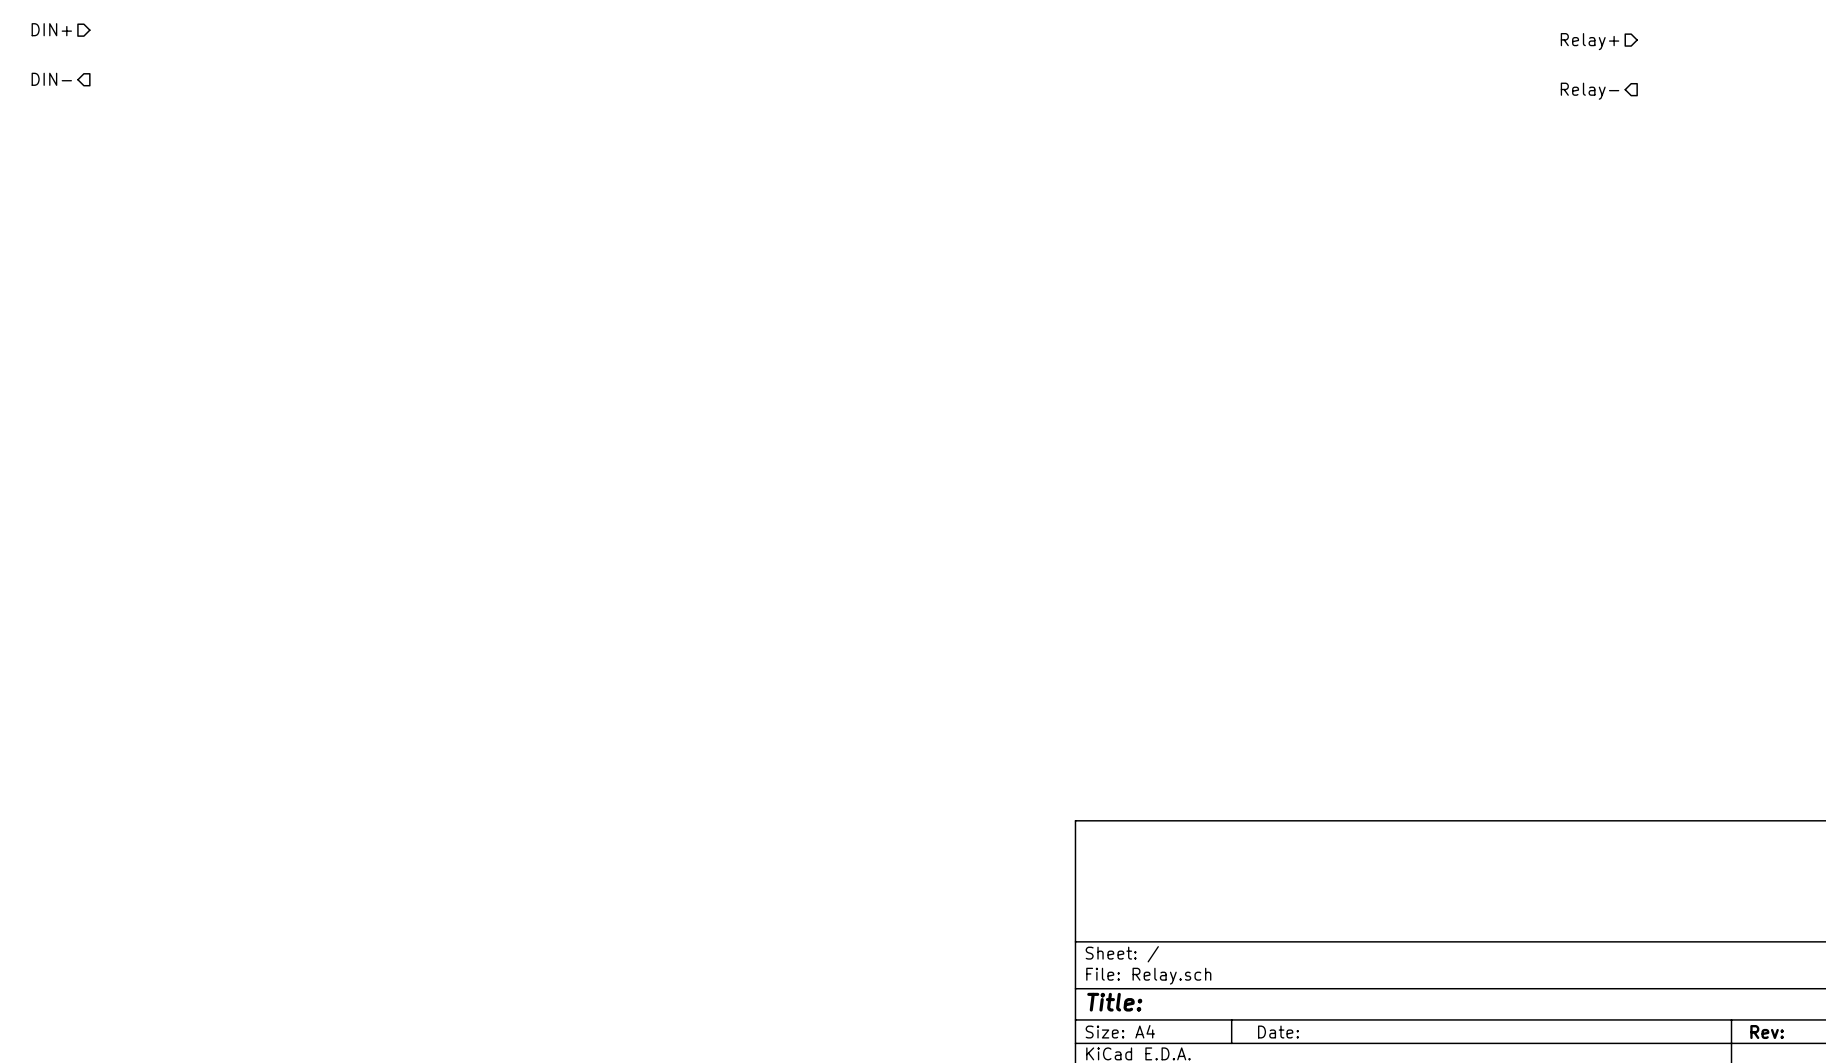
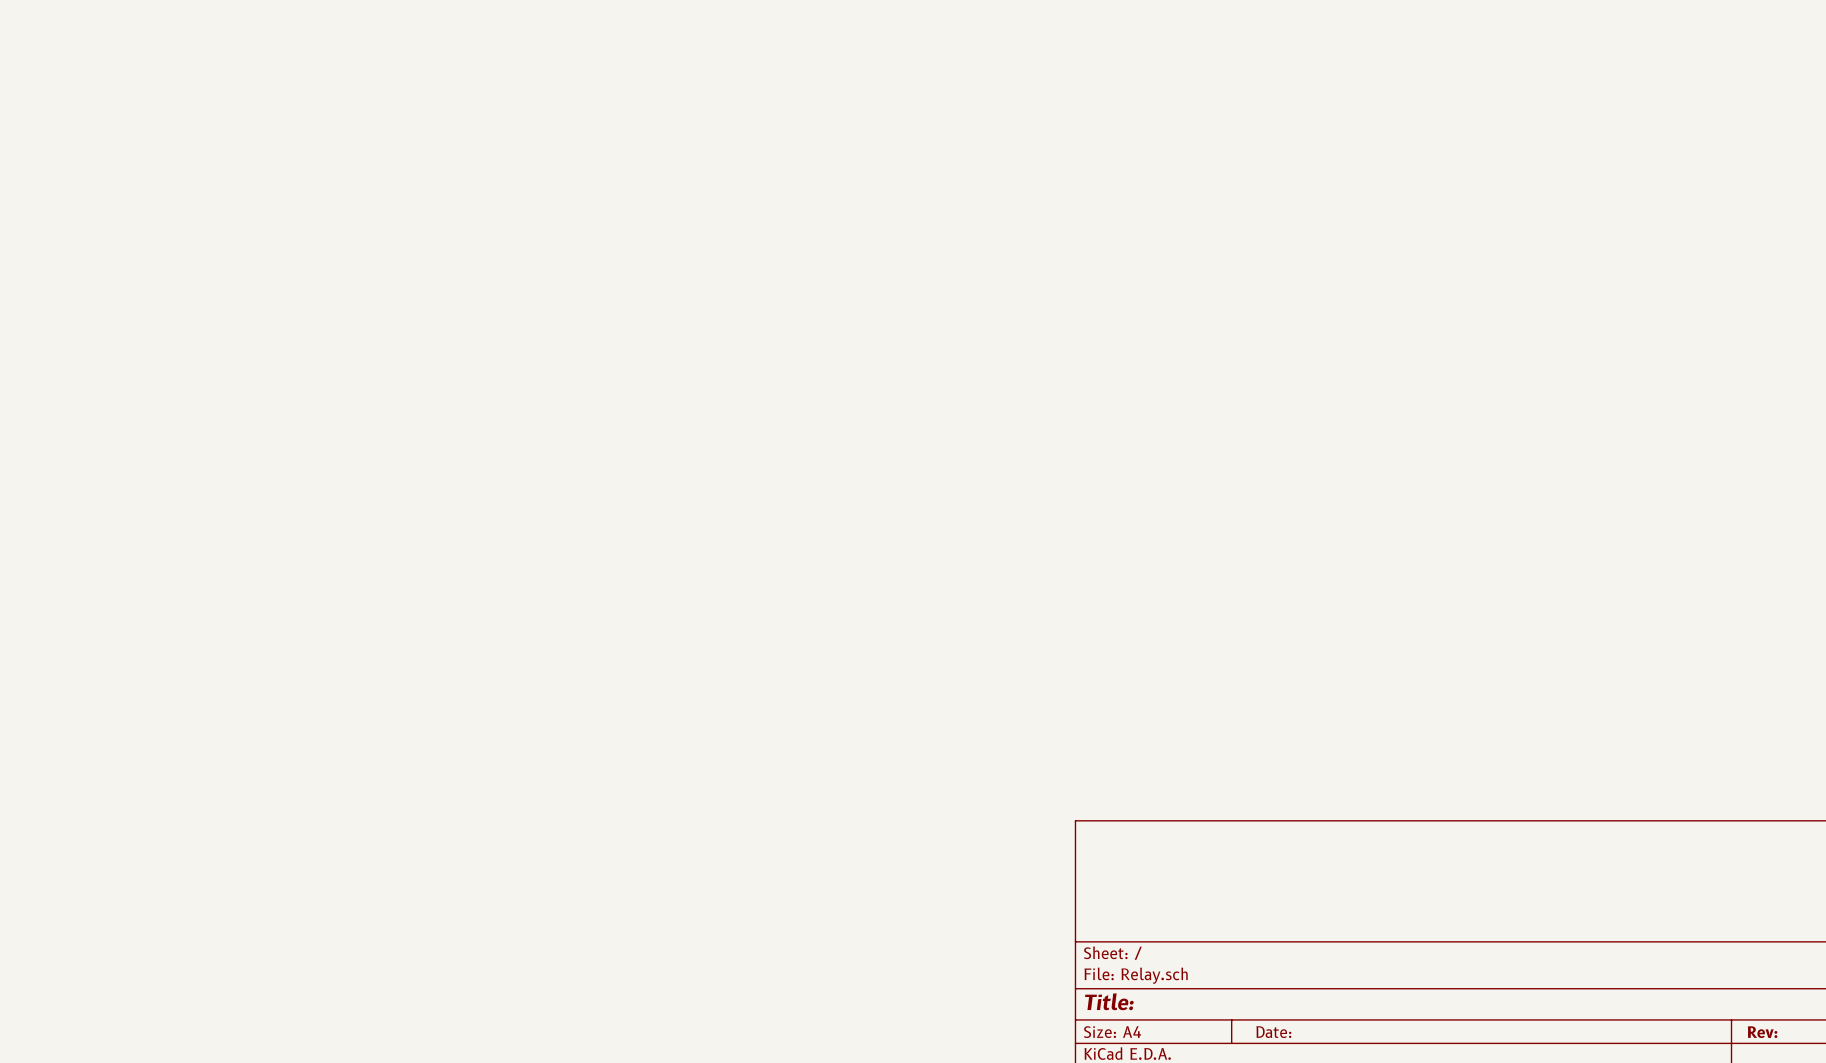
hierarchical label: DIN+ (51, 29) -> none
hierarchical label: Relay+ (1590, 41) -> none
hierarchical label: DIN- (51, 79) -> none
hierarchical label: Relay- (1590, 91) -> none

